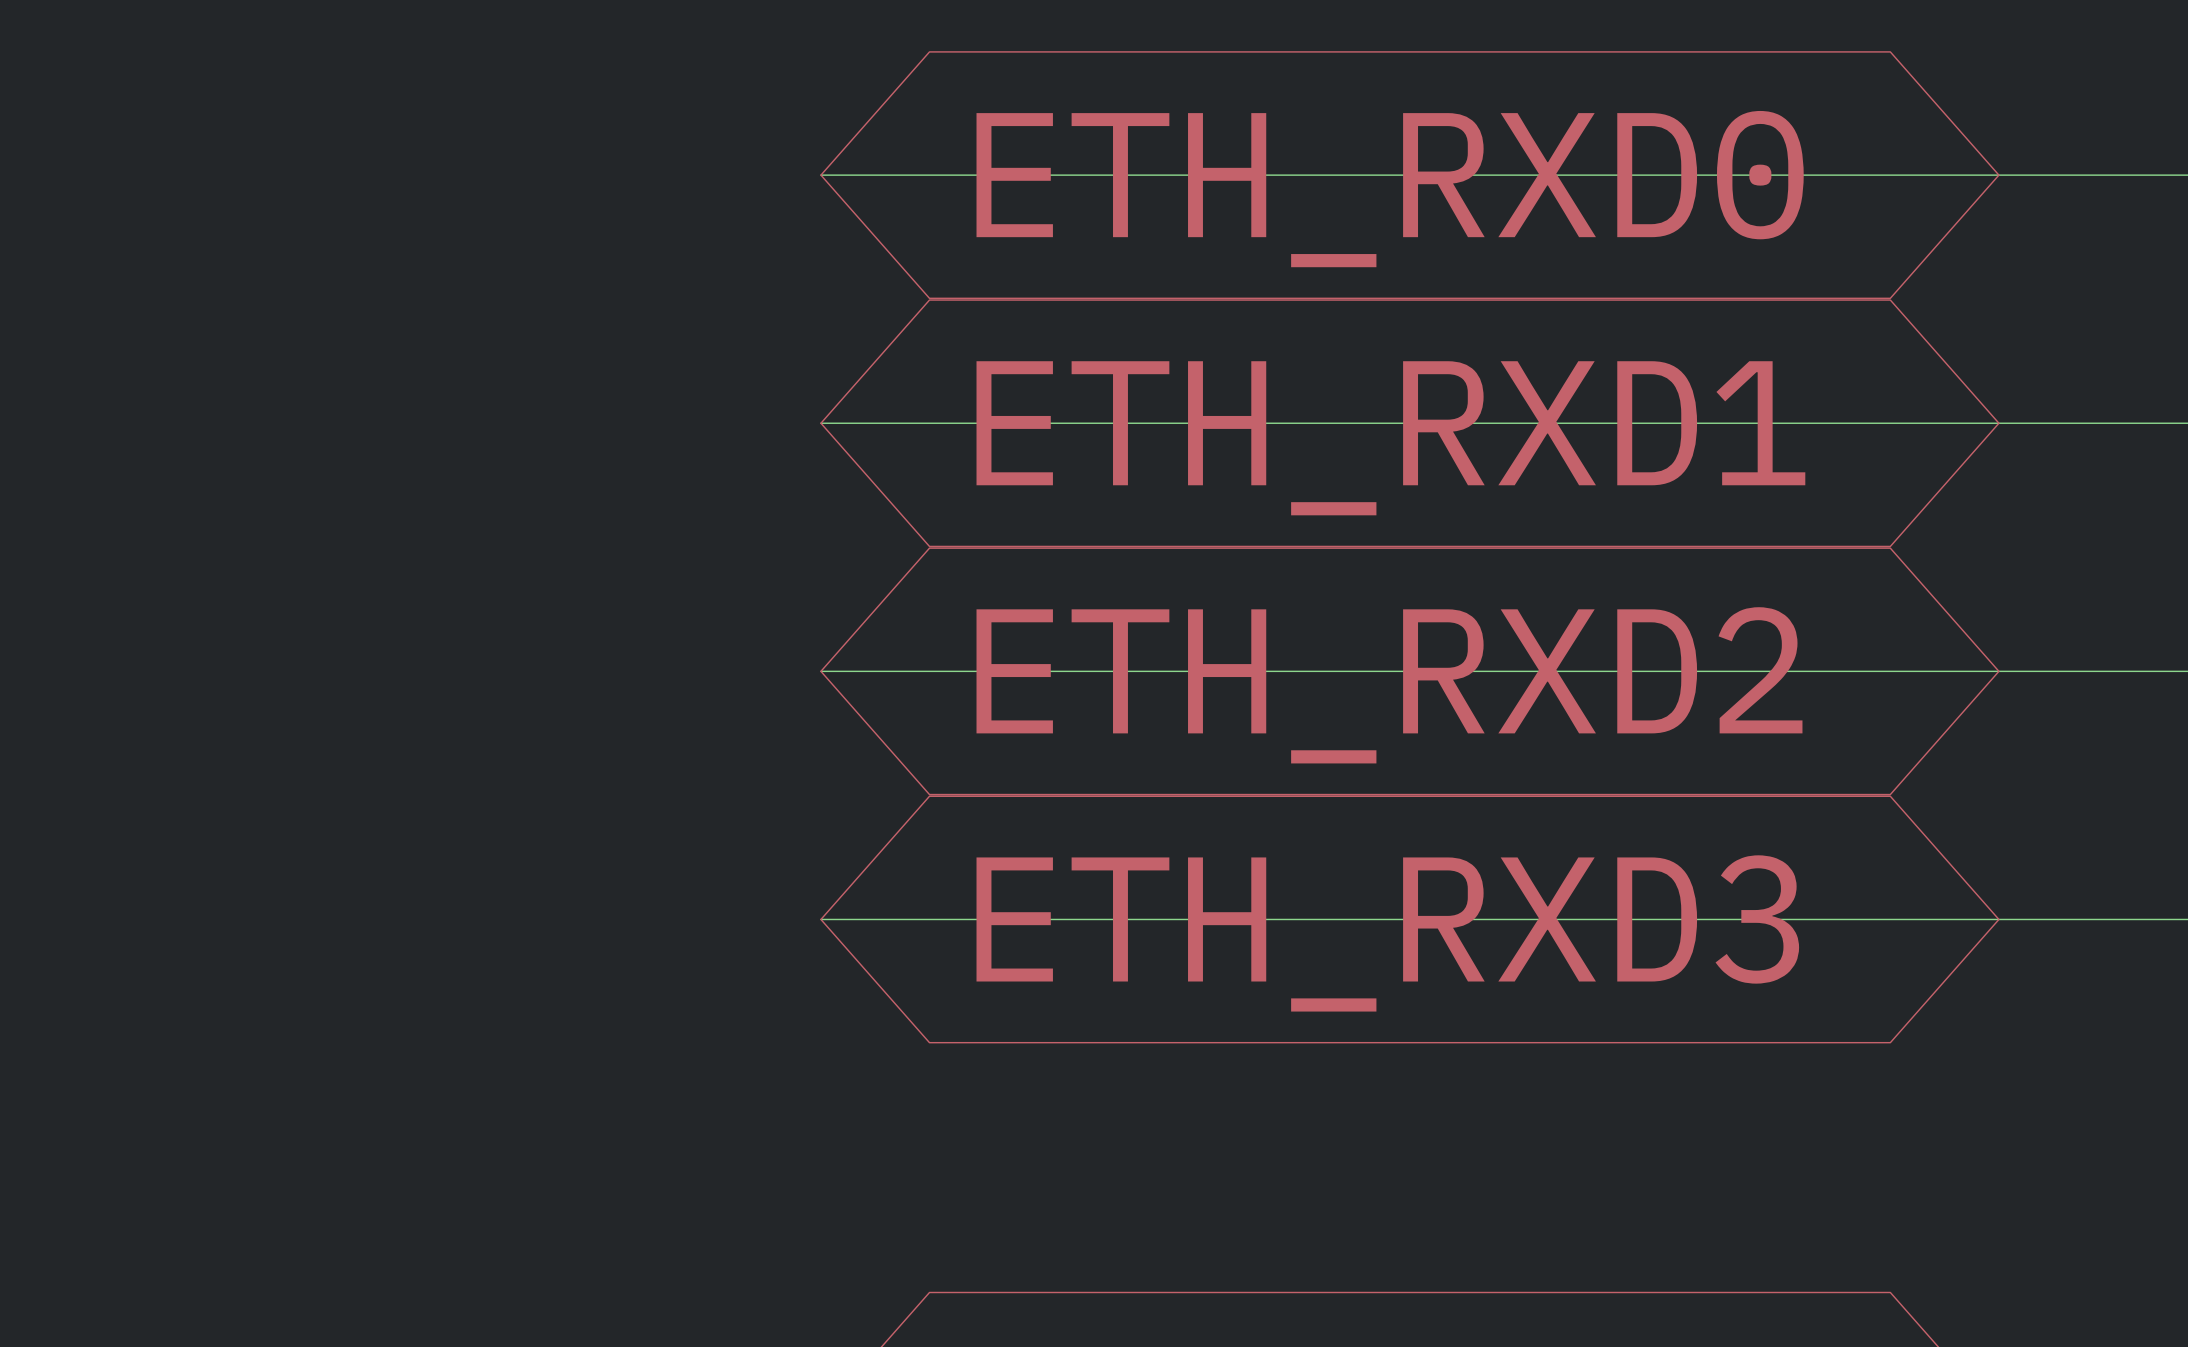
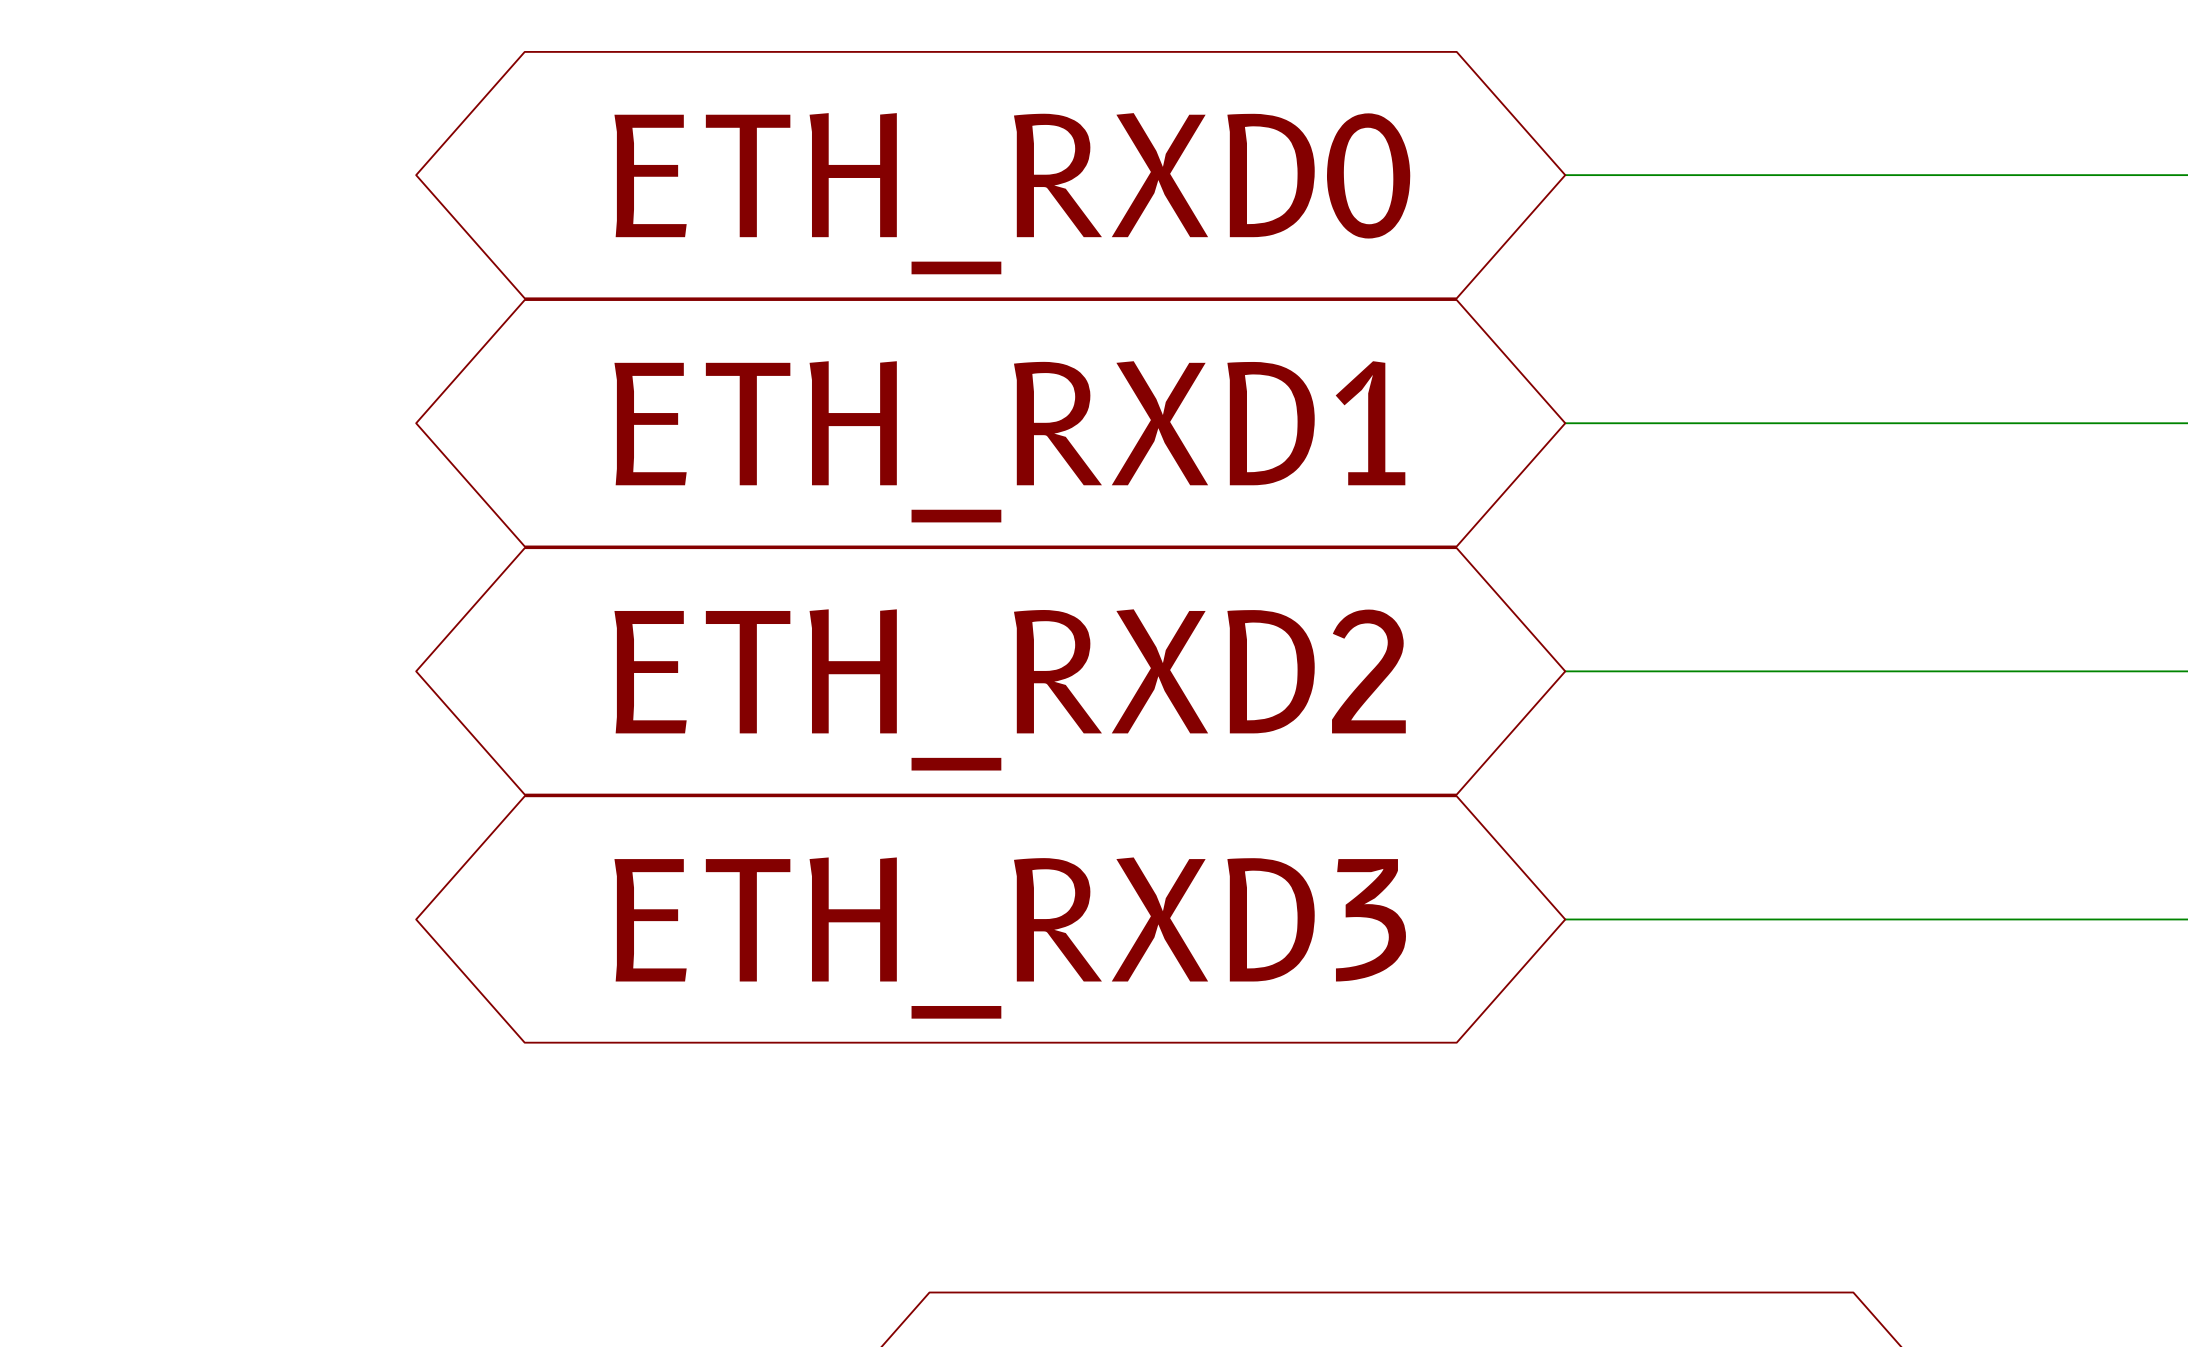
wire: (820, 175) (1565, 175) -> none
global label rotation: 0° (1390, 189) -> 180° (1012, 193)
wire: (820, 423) (1565, 423) -> none
global label rotation: 0° (1390, 438) -> 180° (1009, 441)
wire: (820, 671) (1565, 671) -> none
global label rotation: 0° (1389, 685) -> 180° (1010, 689)
wire: (820, 919) (1565, 919) -> none
global label rotation: 0° (1387, 933) -> 180° (1010, 938)

